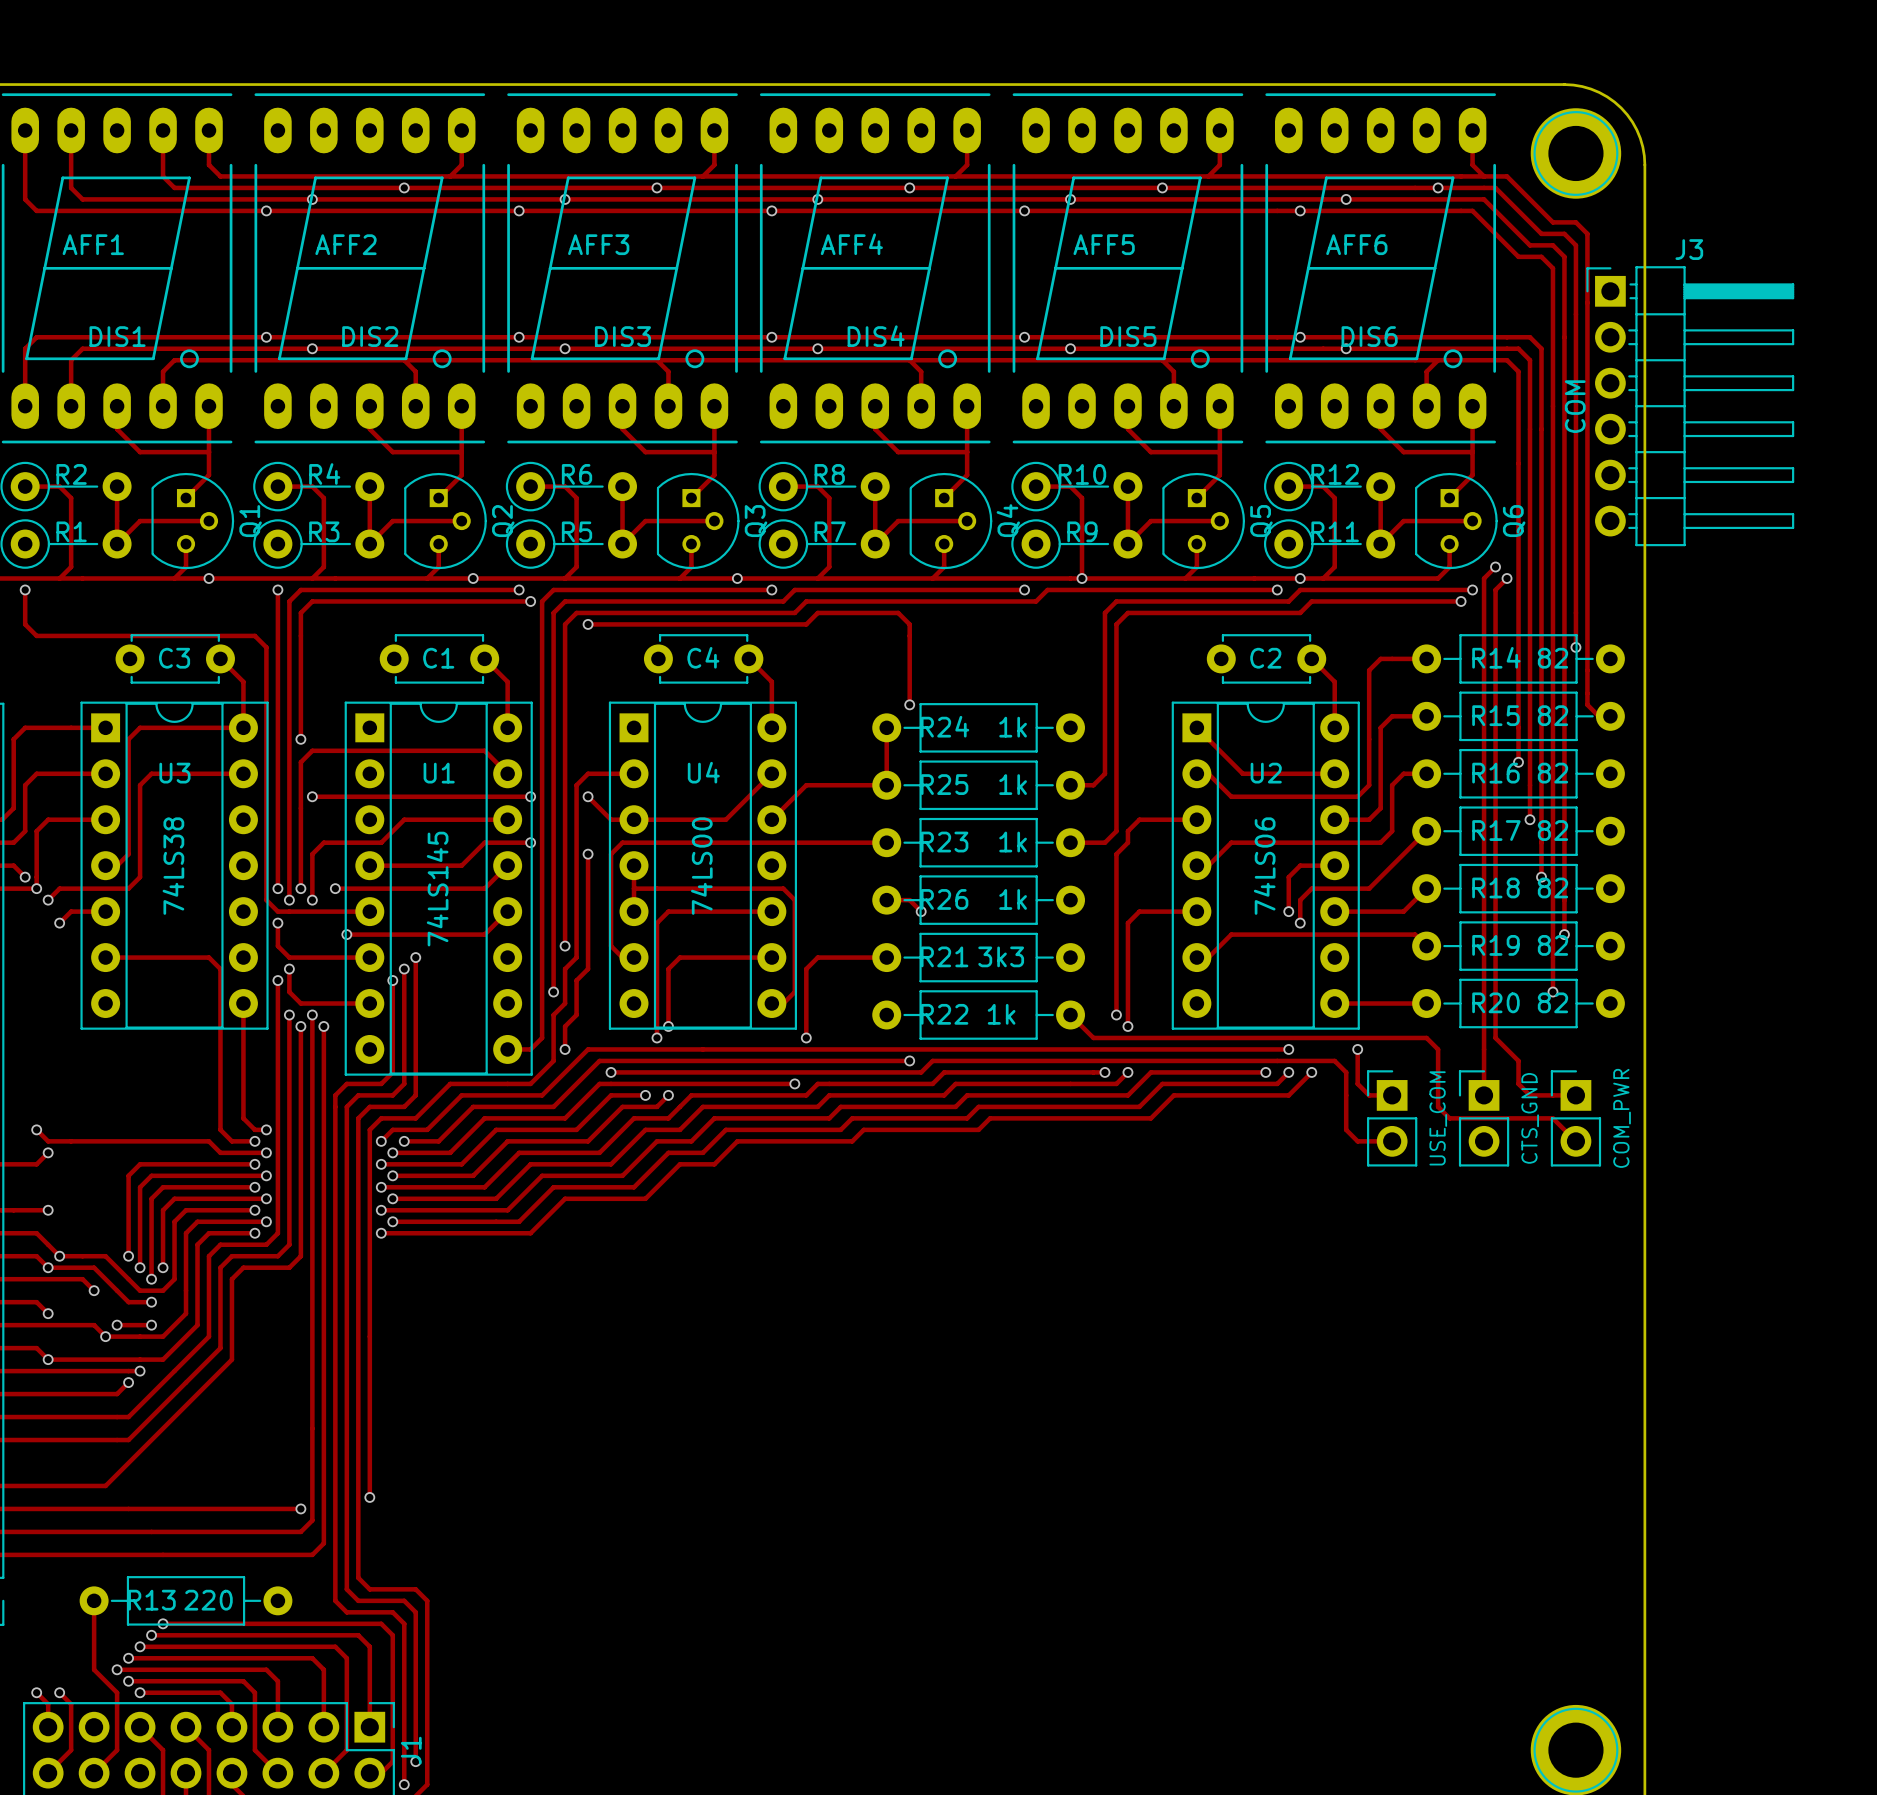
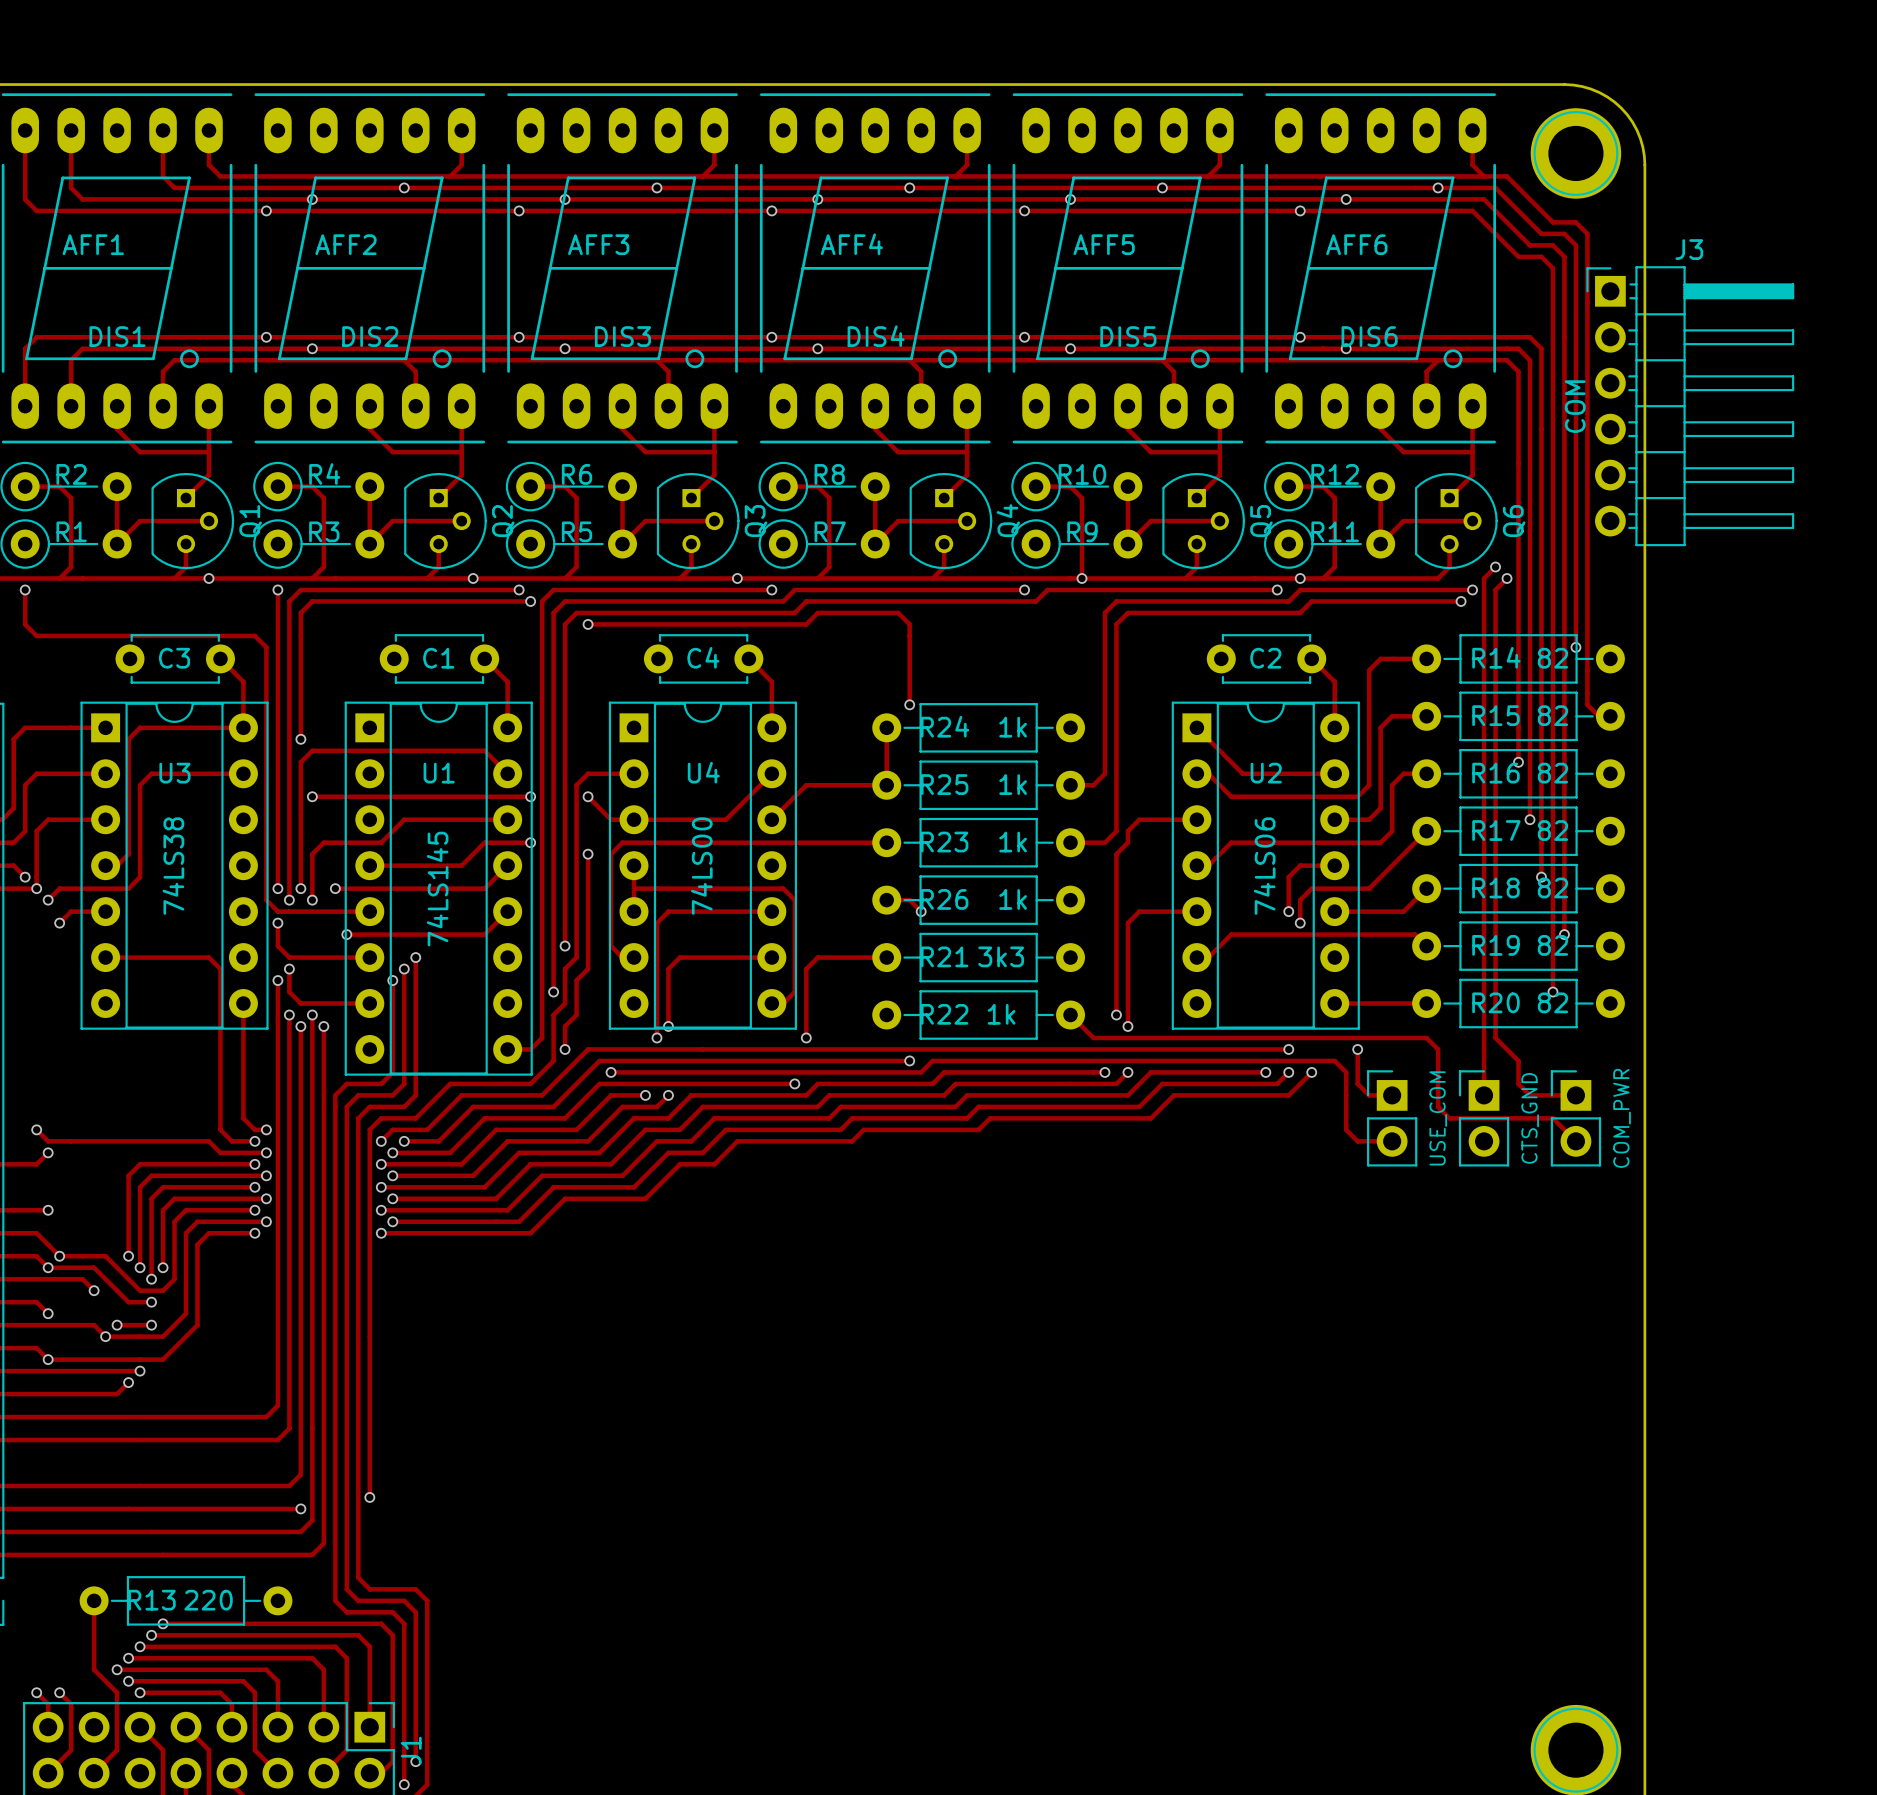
track: (277, 1233) (266, 1244) (220, 1244) (208, 1256) (208, 1336) (128, 1417) -> (277, 1233) (277, 1405) (266, 1417) (128, 1417)
track: (289, 1244) (277, 1256) (231, 1256) (220, 1267) (220, 1348) (128, 1440) -> (289, 1244) (289, 1428) (277, 1440) (128, 1440)
track: (300, 1256) (289, 1267) (243, 1267) (231, 1279) (231, 1359) (105, 1485) -> (300, 1256) (300, 1474) (289, 1485) (105, 1485)

